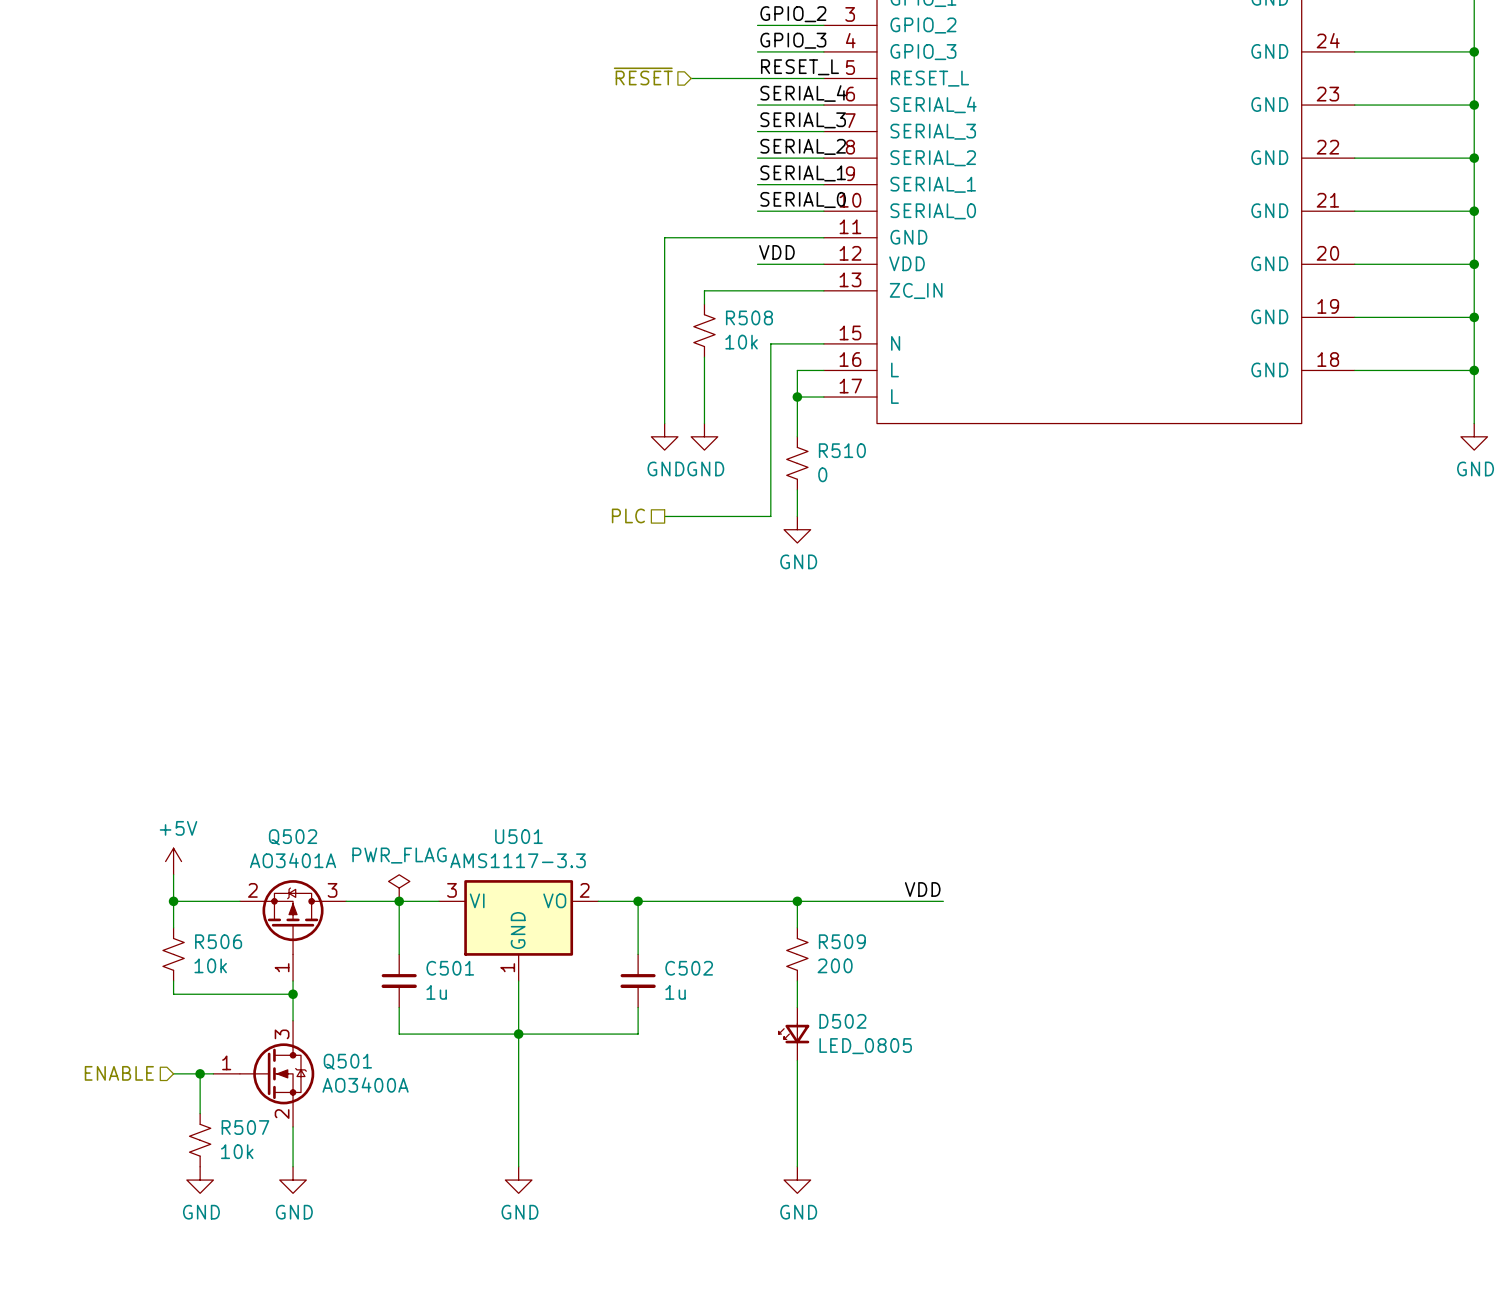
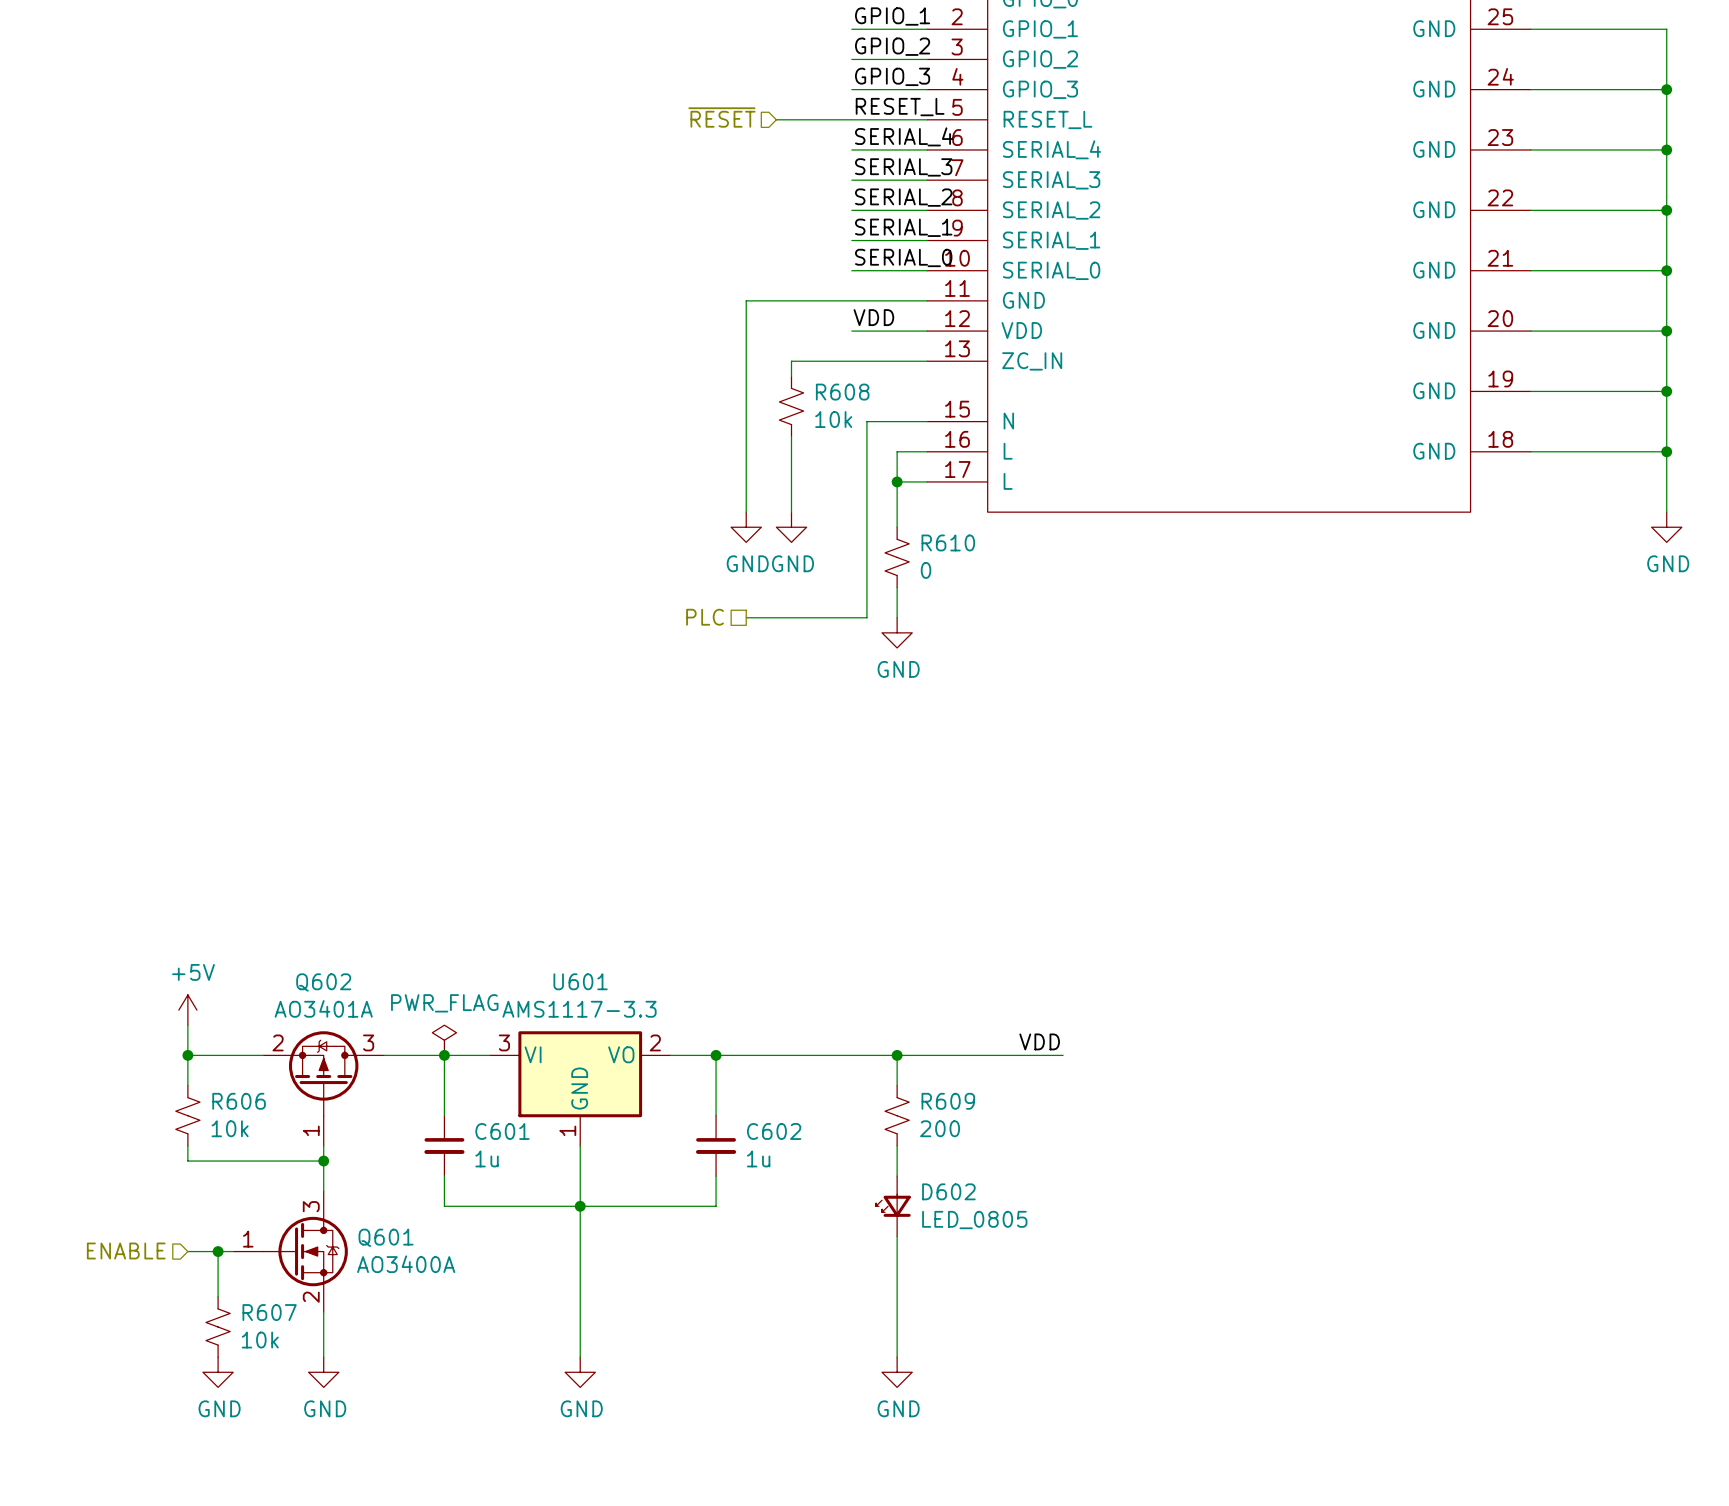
R508 name: R508 (749, 317) -> R608 (842, 392)
R510 name: R510 (842, 450) -> R610 (948, 542)
U501 name: U501 (518, 836) -> U601 (580, 981)
Q502 name: Q502 (293, 837) -> Q602 (323, 982)
R506 name: R506 (218, 941) -> R606 (239, 1101)
R509 name: R509 (842, 941) -> R609 (948, 1101)
C501 name: C501 (450, 968) -> C601 (502, 1131)
C502 name: C502 (689, 968) -> C602 (774, 1131)
D502 name: D502 (842, 1021) -> D602 (948, 1191)
Q501 name: Q501 (347, 1061) -> Q601 (386, 1237)
R507 name: R507 (245, 1127) -> R607 (269, 1312)

